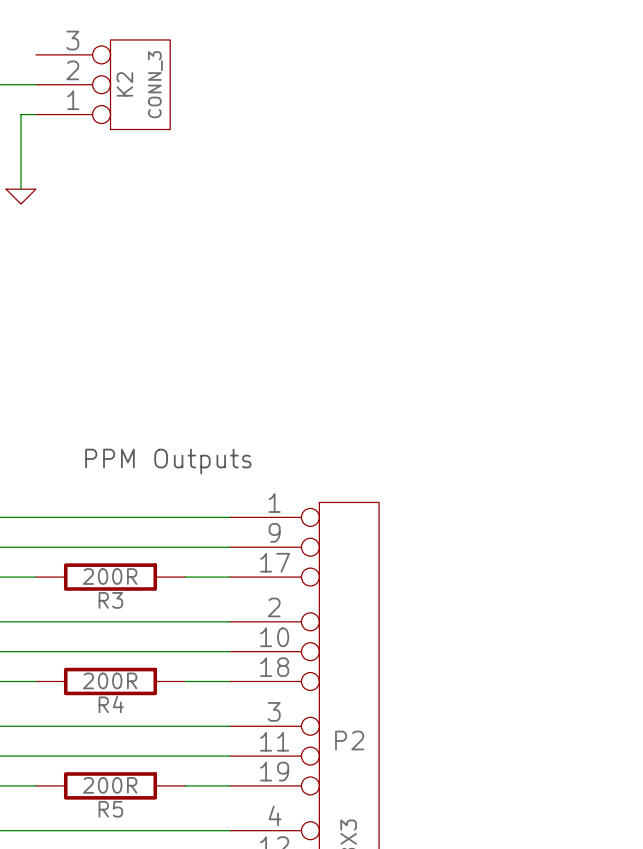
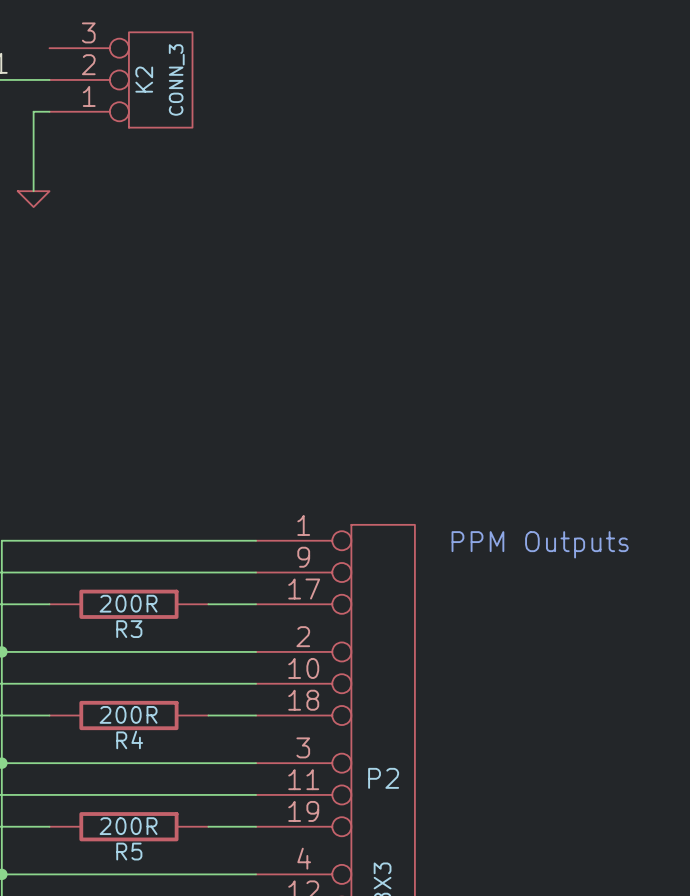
text: PPM Outputs (168, 461) -> none
text: none -> PPM Outputs (540, 544)

